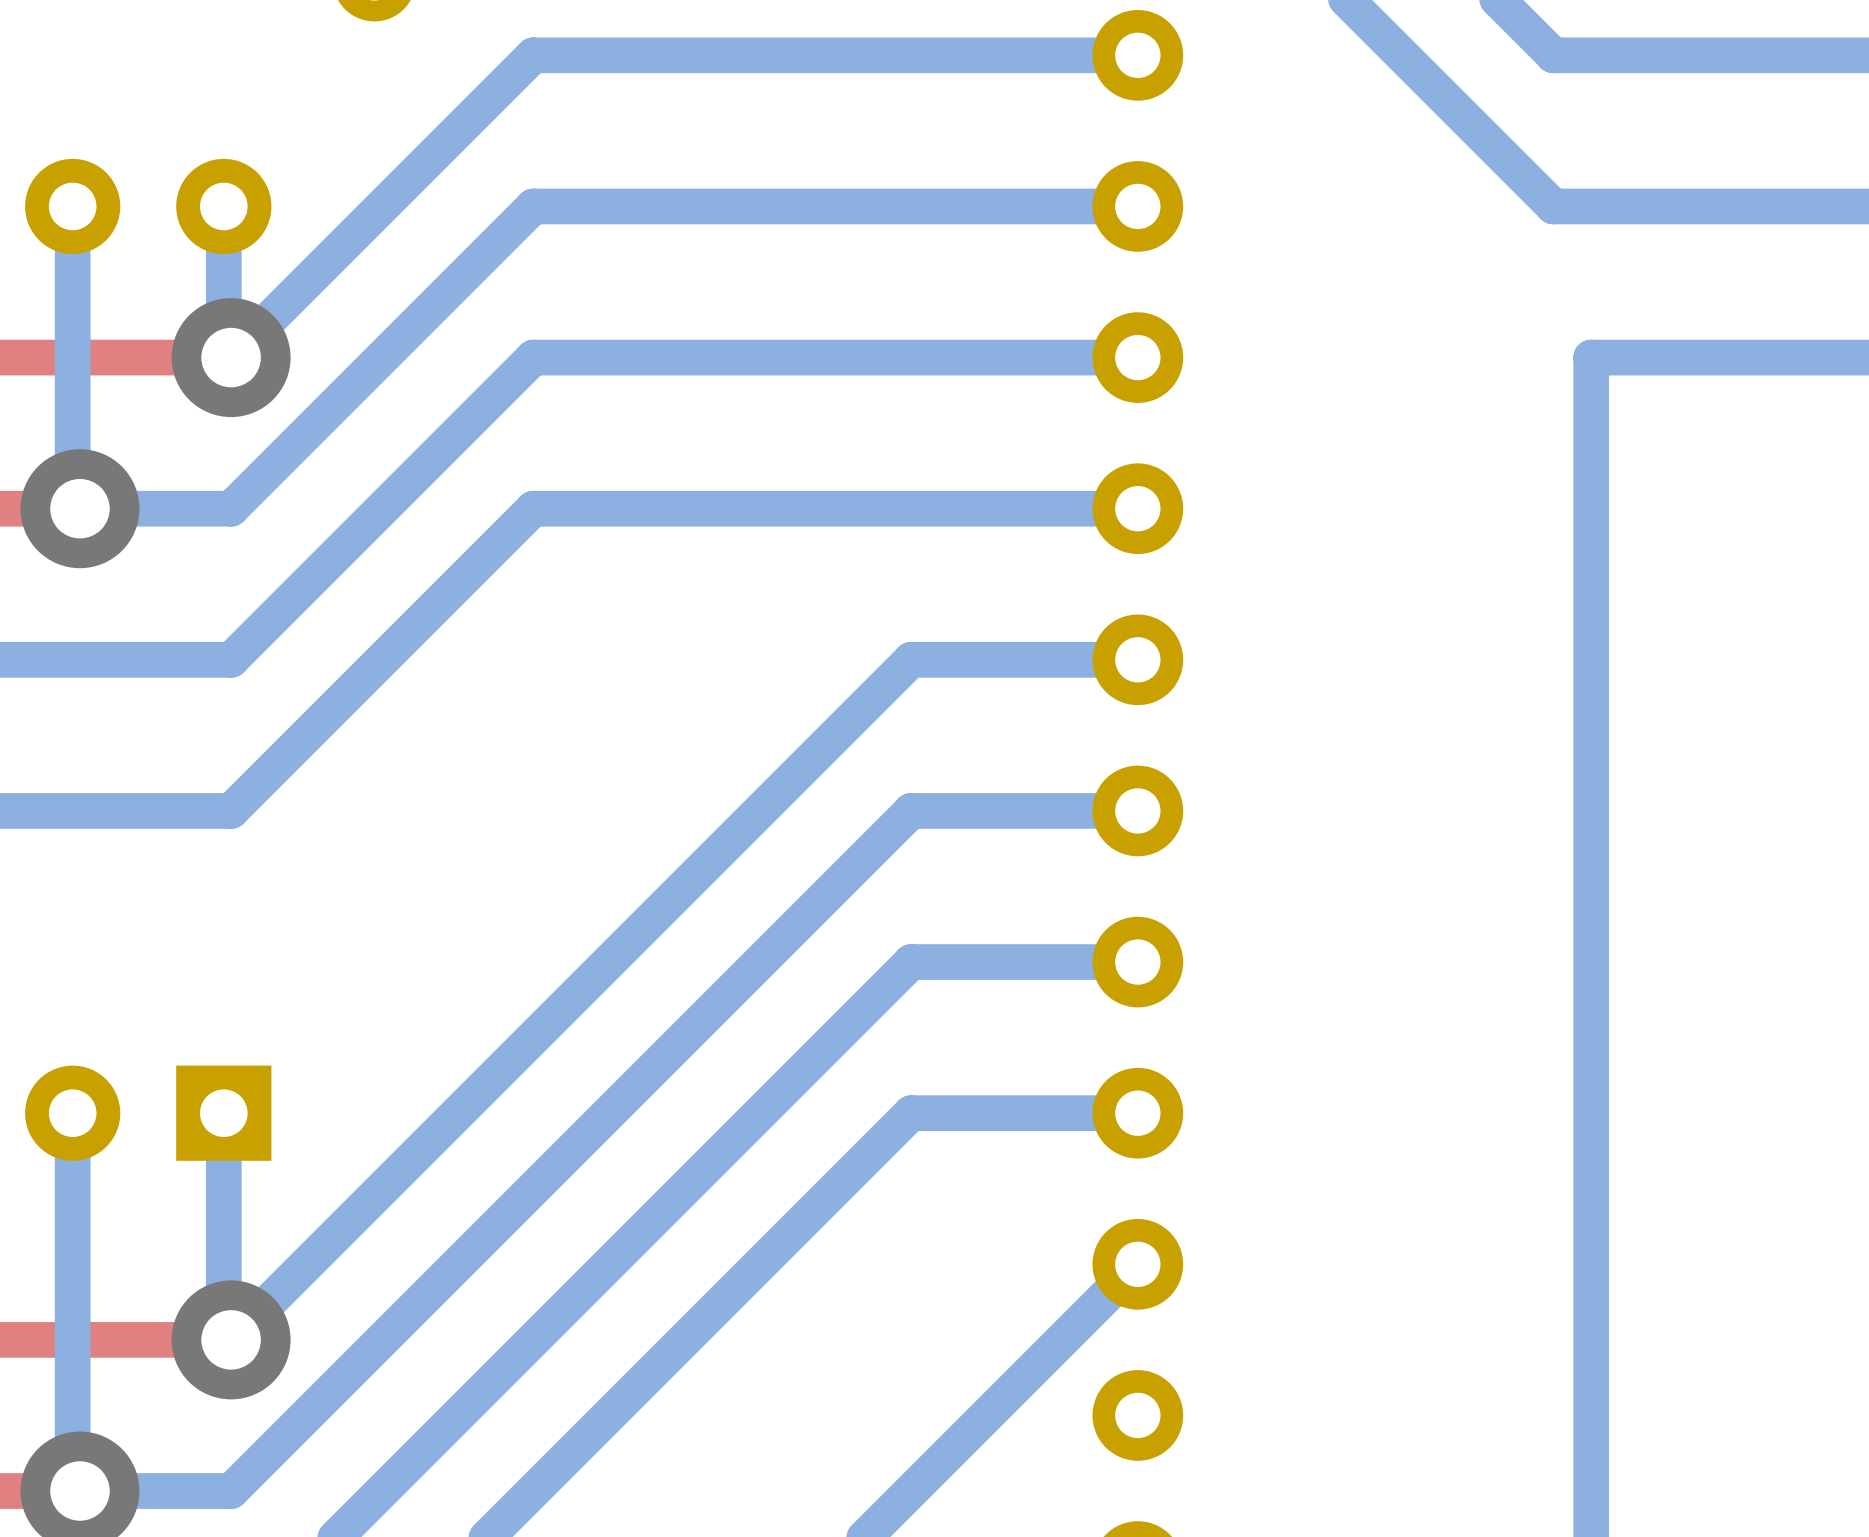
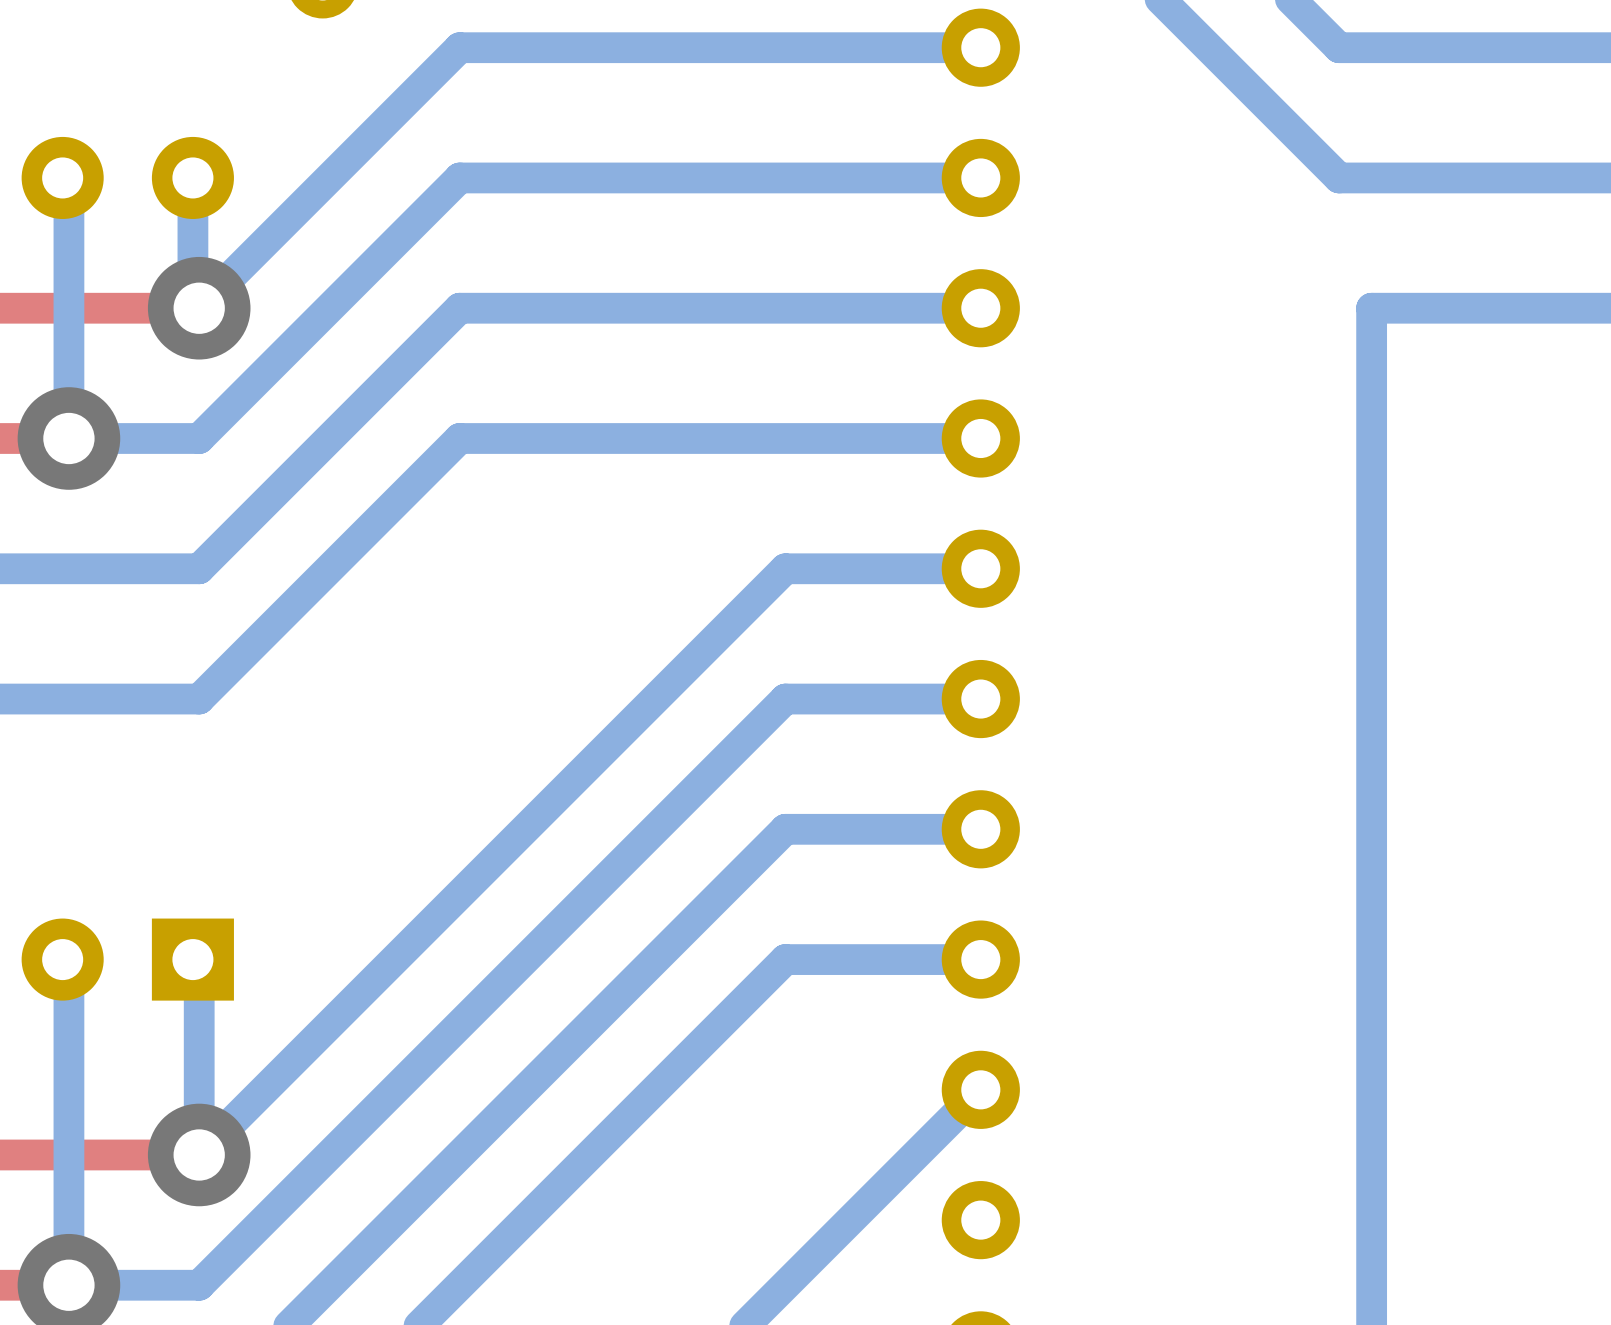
bottom track: (72, 206) (72, 501) -> none
bottom track: none -> (68, 177) (68, 438)
bottom track: (72, 1113) (72, 1483) -> none
bottom track: none -> (68, 959) (68, 1285)
bottom track: (223, 1113) (223, 1332) -> none
bottom track: none -> (199, 959) (199, 1154)

